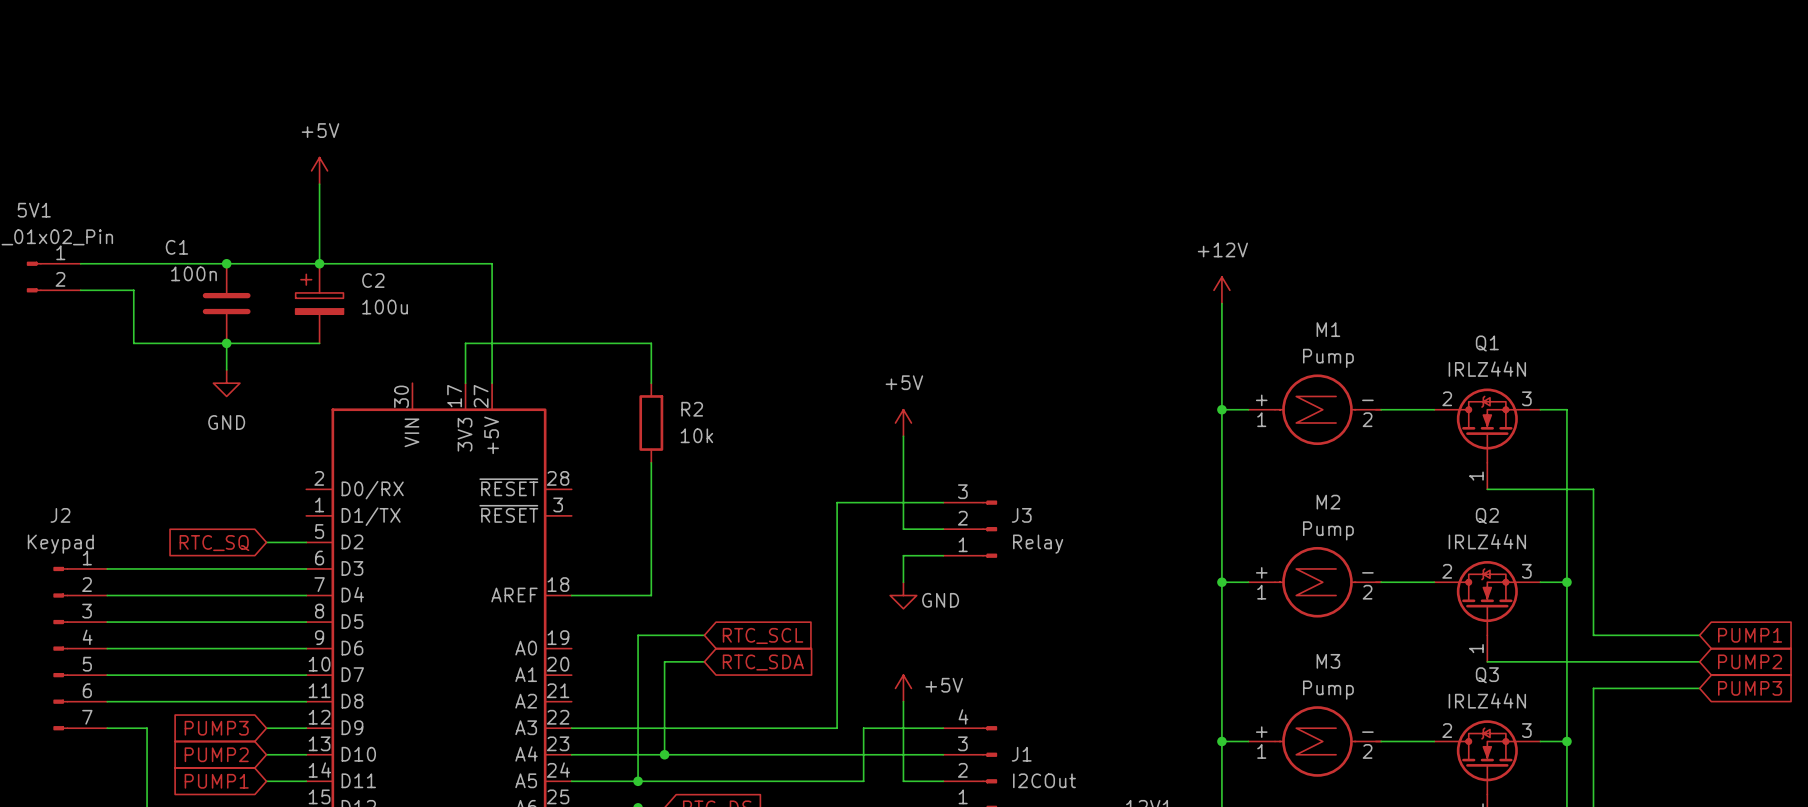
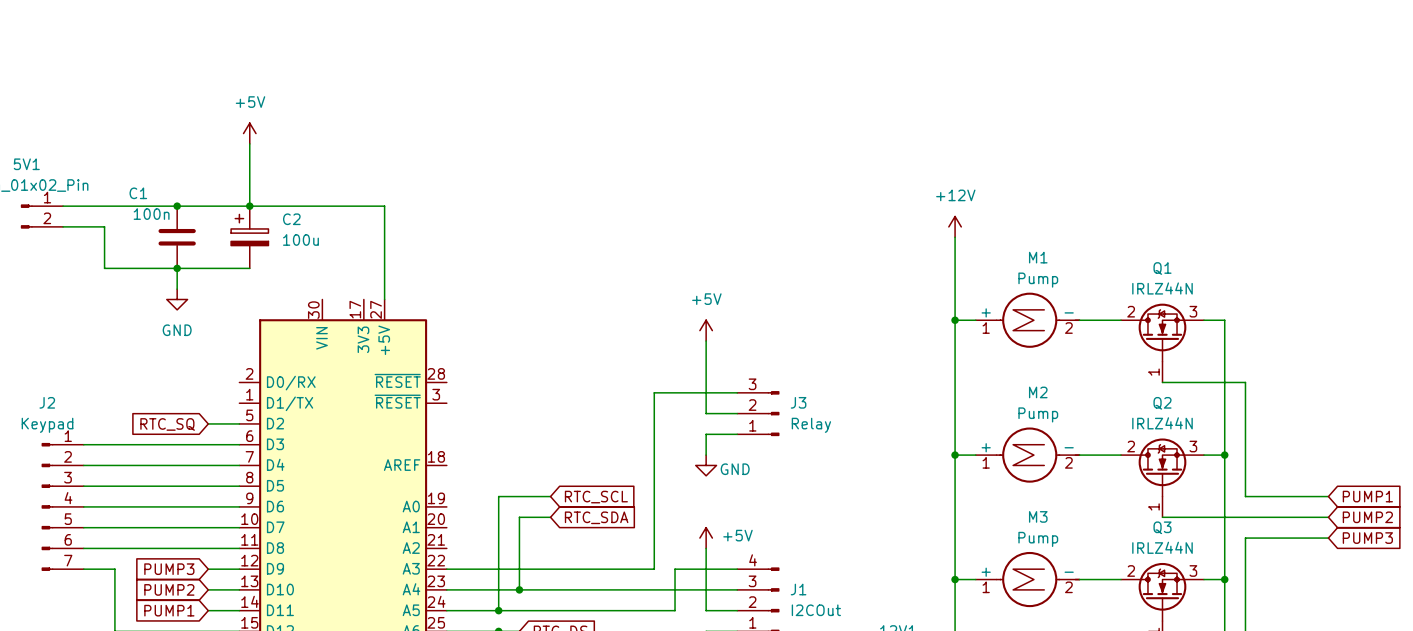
wire: (465, 383) (465, 343) (651, 343) (651, 383) -> none
R2: 10k (651, 423) -> none
wire: (651, 462) (651, 595) (571, 595) -> none

